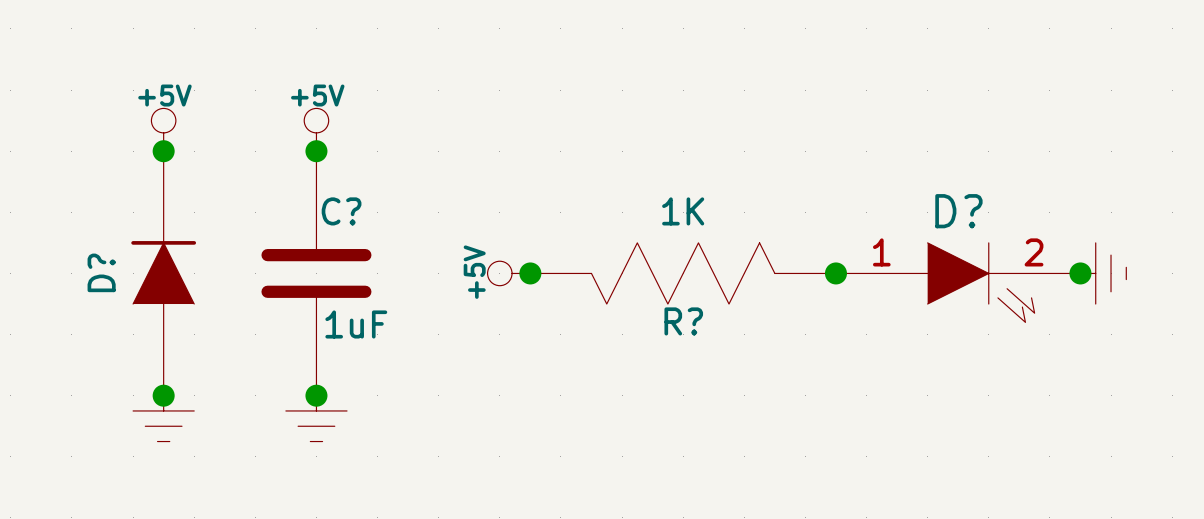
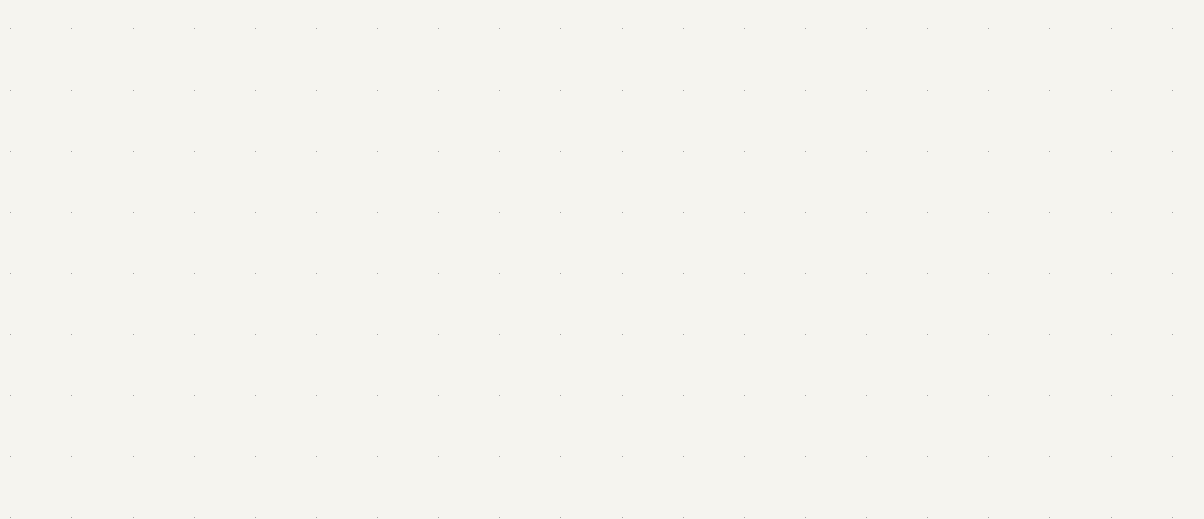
power symbol: +5V (163, 129) -> none
power symbol: +5V (316, 129) -> none
junction: (163, 151) -> none
junction: (316, 151) -> none
D?: (163, 273) -> none
C?: 1uF (316, 273) -> none
power symbol: +5V (508, 273) -> none
junction: (530, 273) -> none
R?: 1K (683, 273) -> none
junction: (835, 273) -> none
junction: (1080, 273) -> none
power symbol: (1103, 273) -> none
D?: (958, 282) -> none
junction: (163, 395) -> none
junction: (316, 395) -> none
power symbol: (163, 418) -> none
power symbol: (316, 418) -> none

